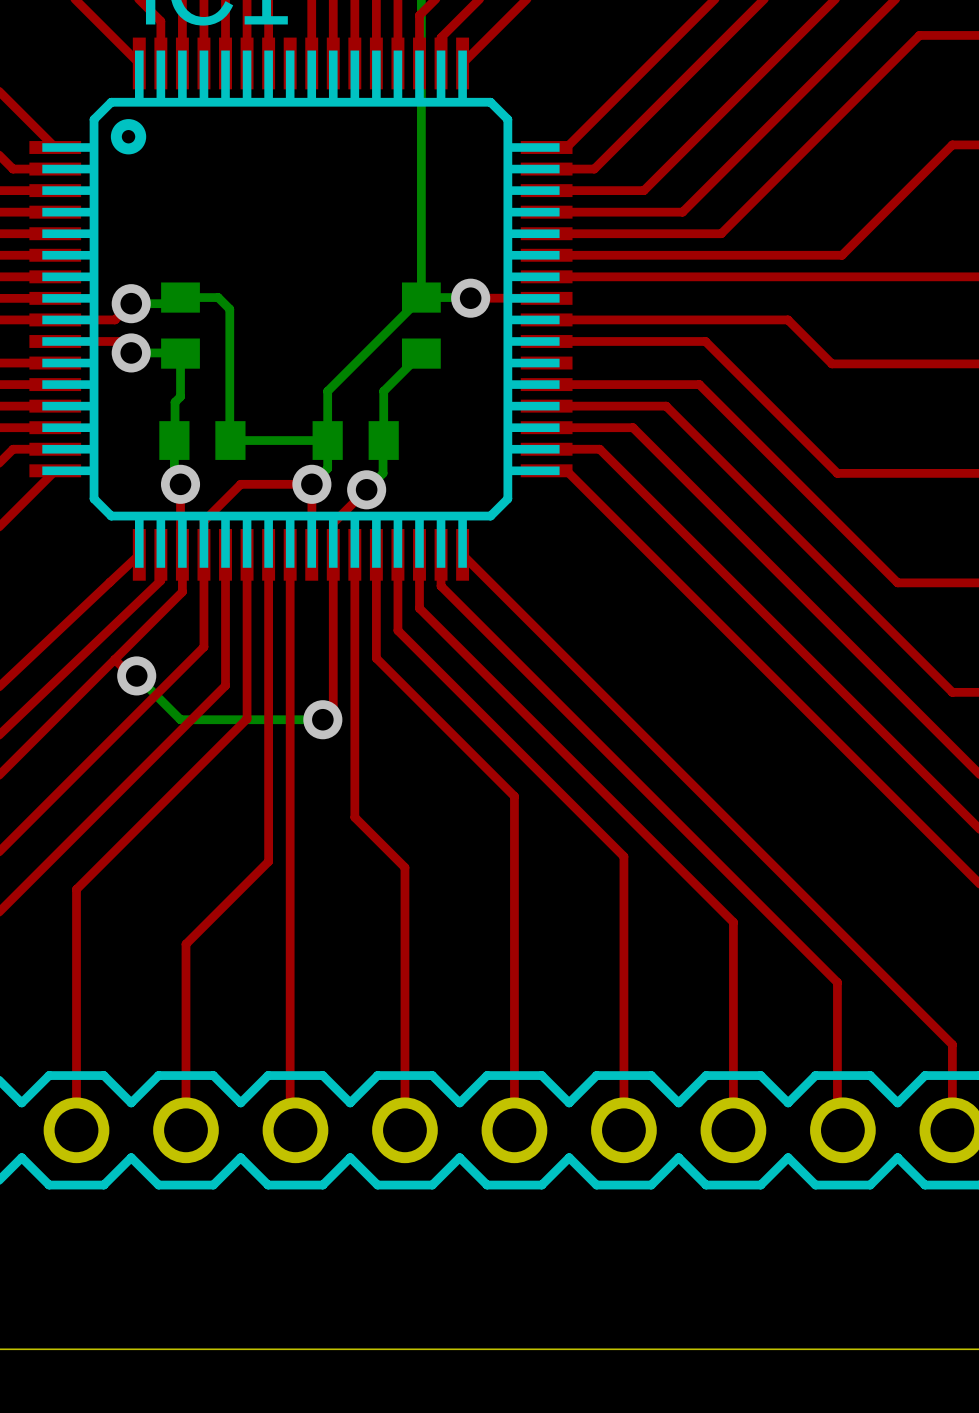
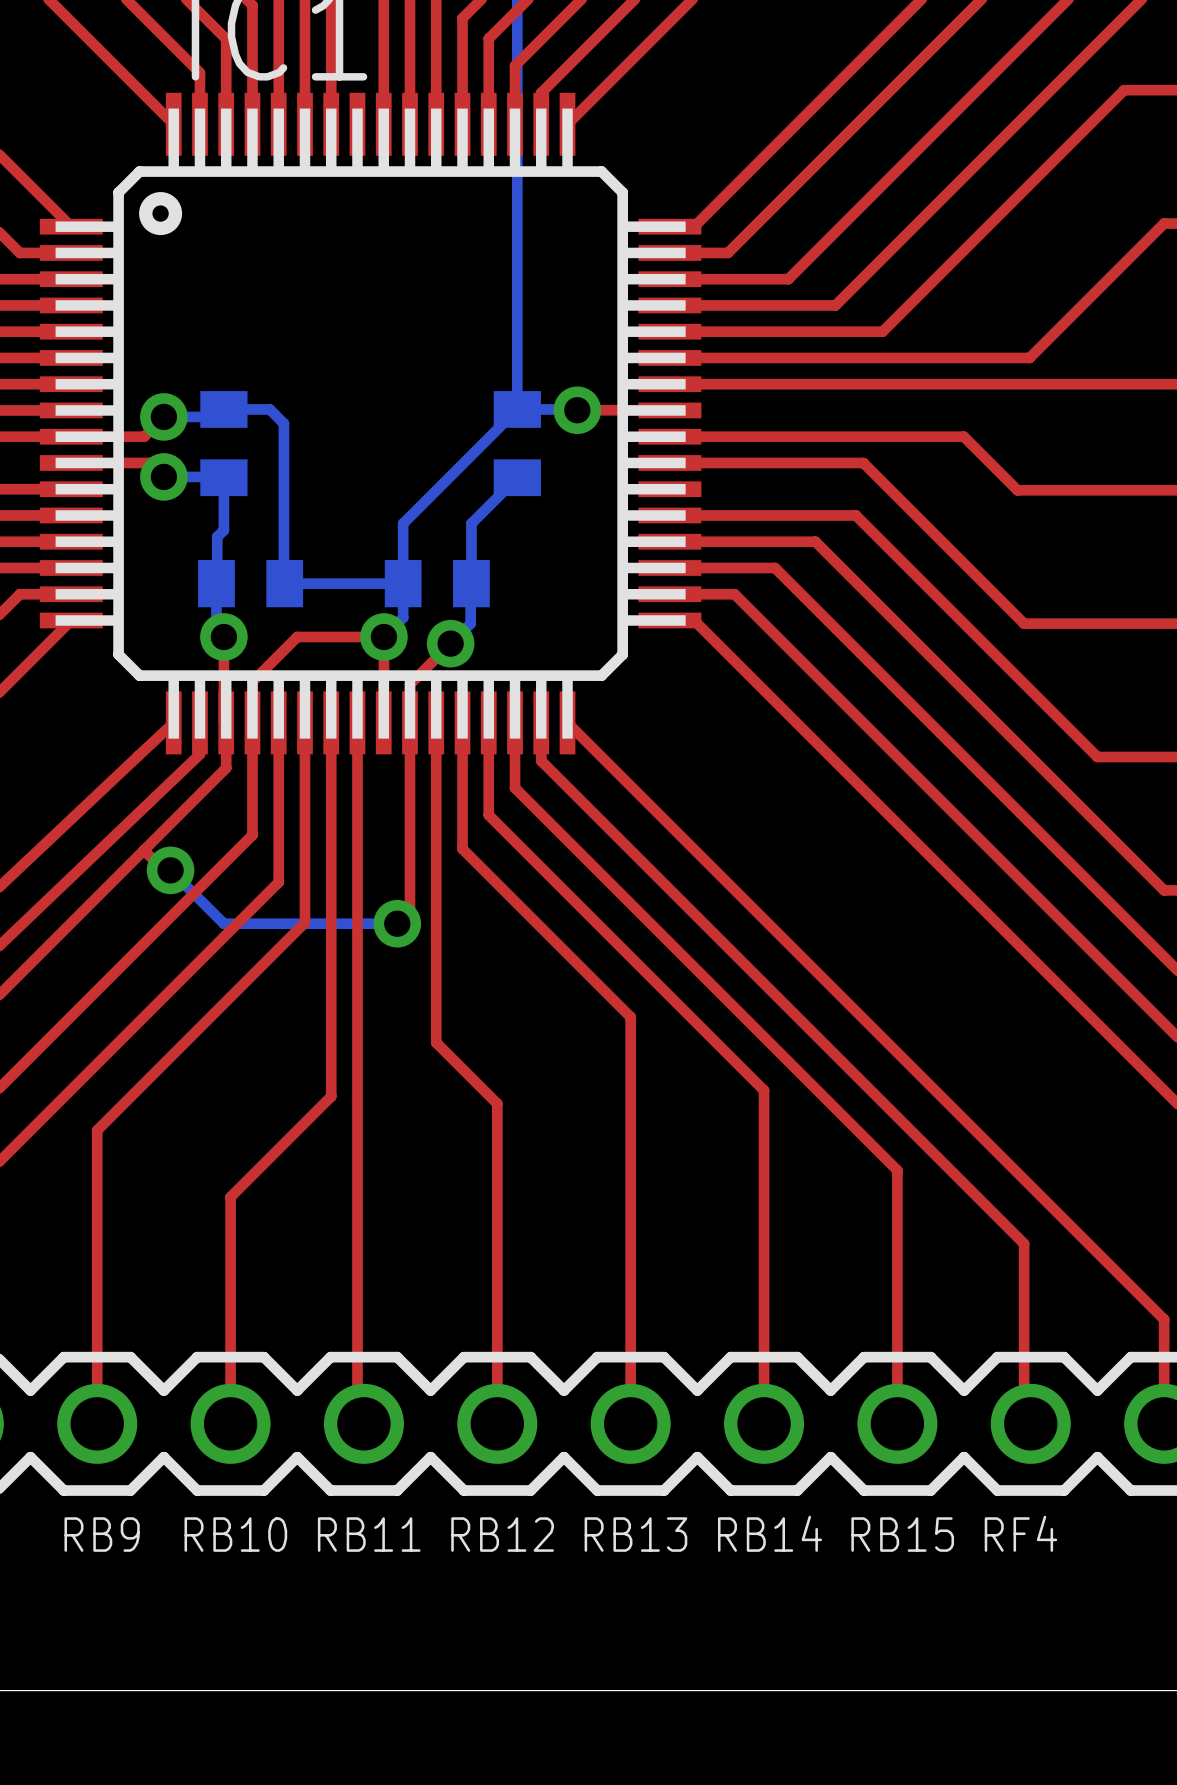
text: none -> RB12 (502, 1534)
text: none -> RB9 (102, 1534)
text: none -> RB10 (235, 1534)
text: none -> RB11 (369, 1534)
text: none -> RB13 (635, 1534)
text: none -> RB14 (770, 1533)
text: none -> RB15 (902, 1534)
text: none -> RF4 (1020, 1533)

